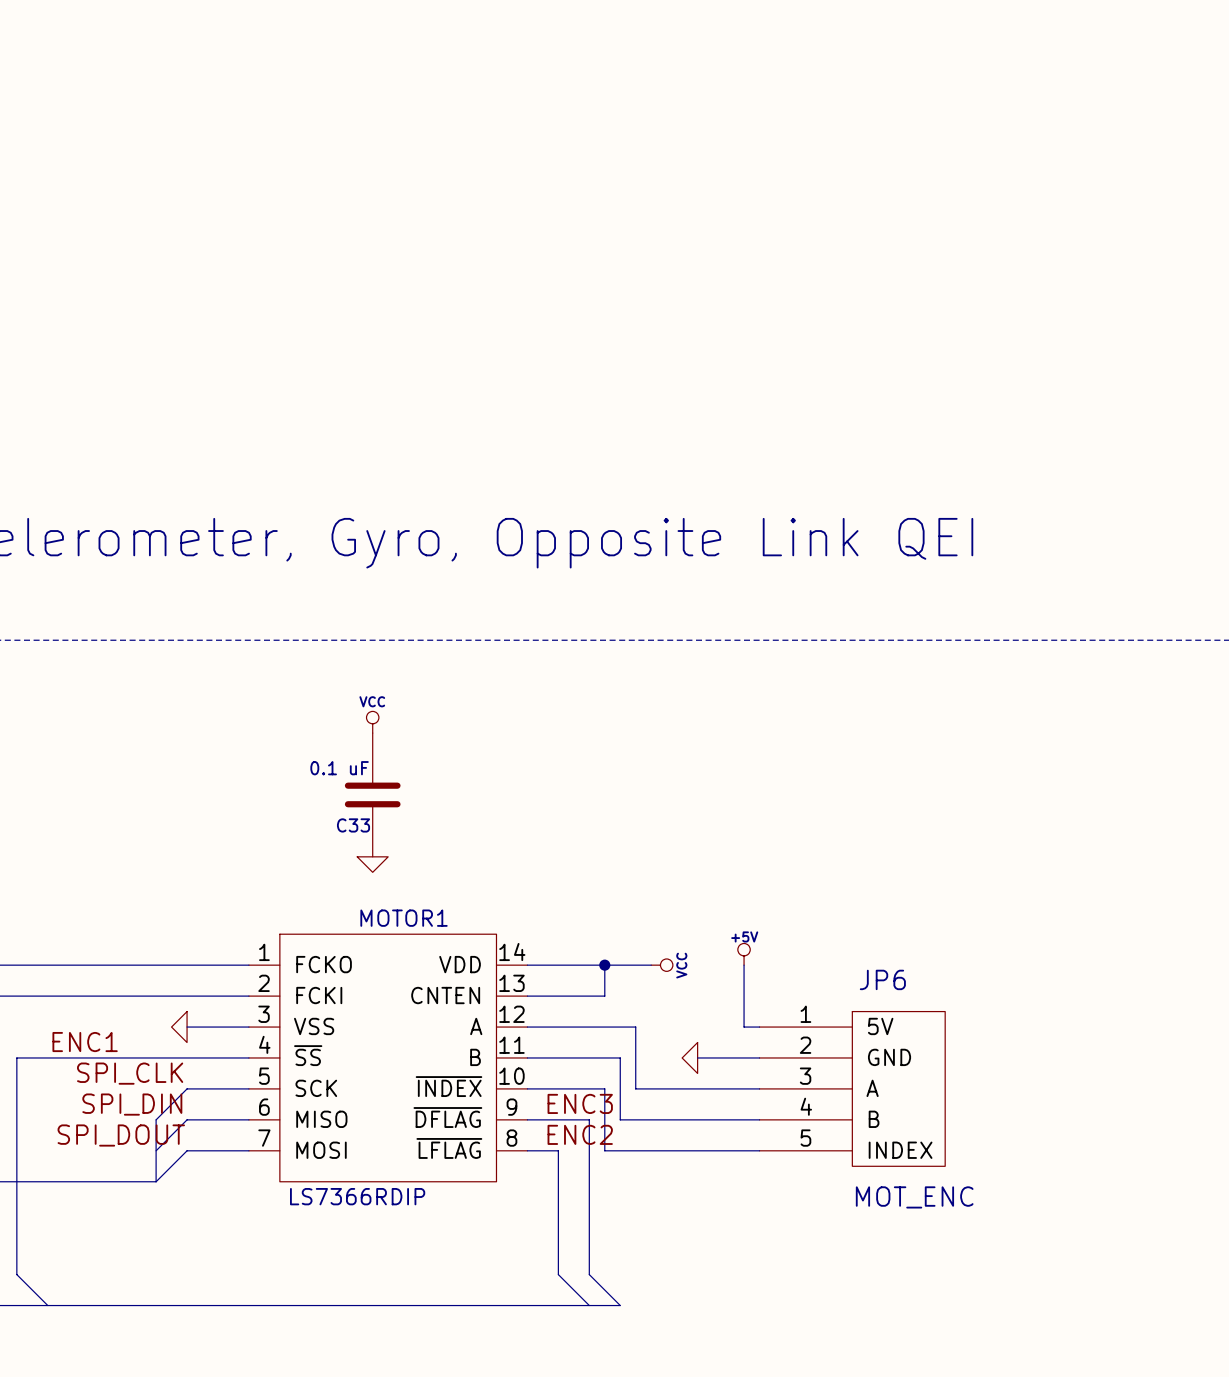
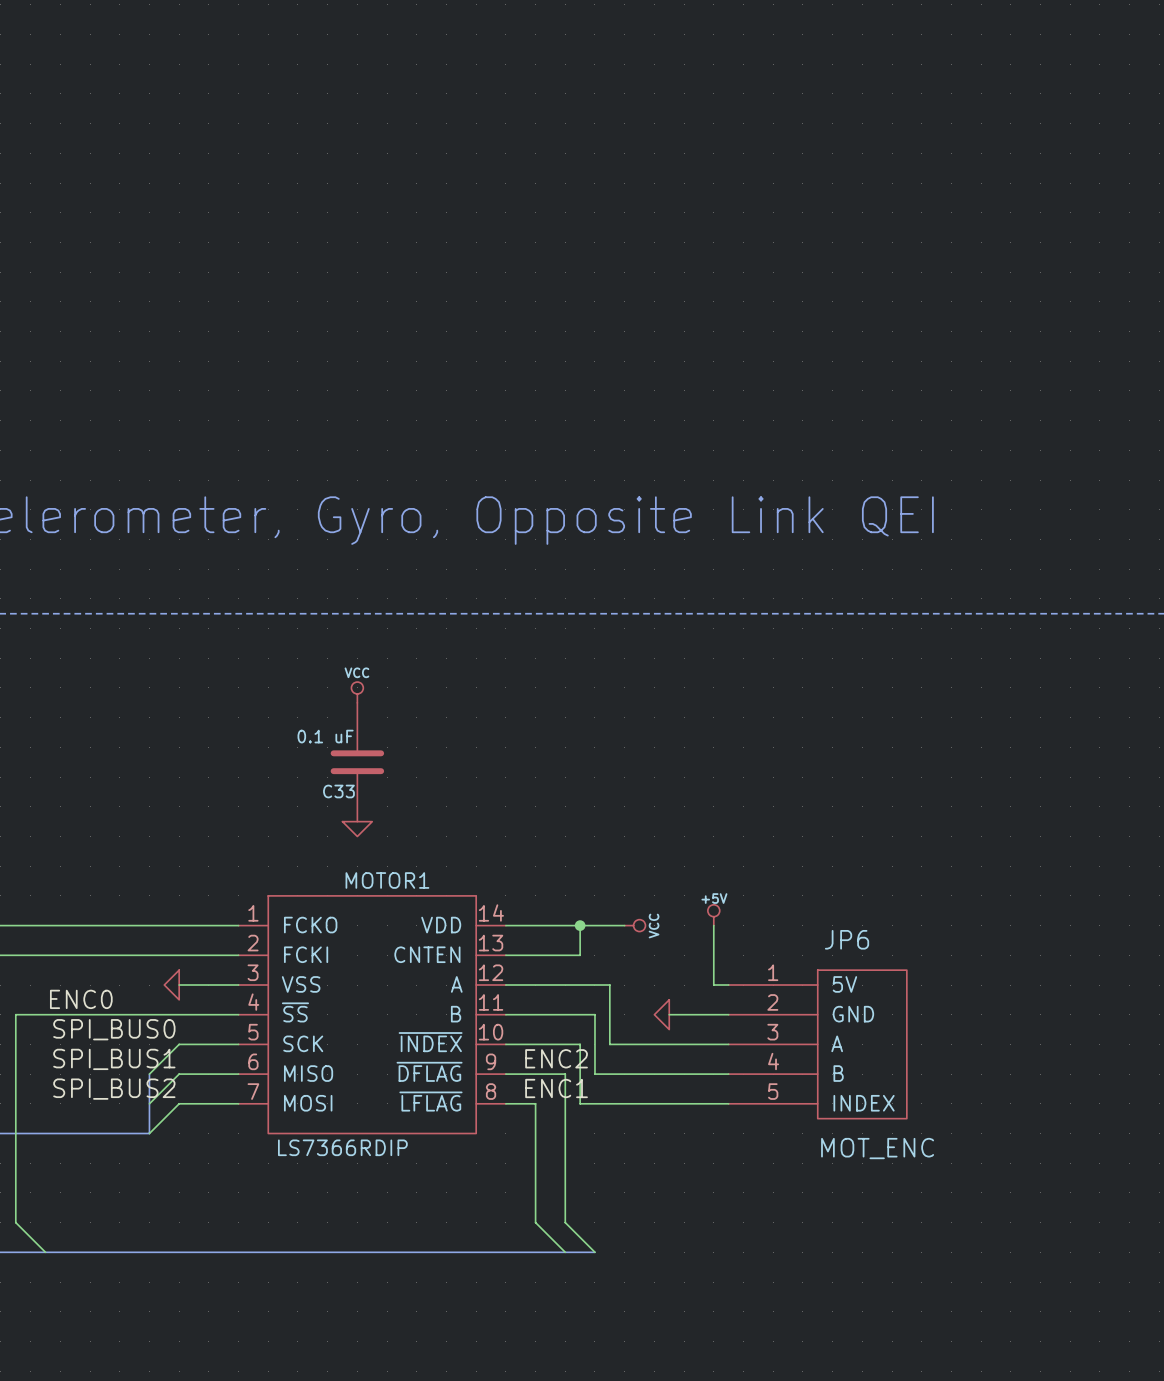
label: ENC1 (85, 1042) -> ENC0 (81, 999)
label: SPI_CLK (130, 1073) -> SPI_BUS0 (114, 1029)
label: ENC3 (580, 1103) -> ENC2 (556, 1058)
label: SPI_DIN (132, 1104) -> SPI_BUS1 (114, 1059)
label: ENC2 (580, 1134) -> ENC1 (556, 1088)
label: SPI_DOUT (121, 1135) -> SPI_BUS2 (114, 1089)

